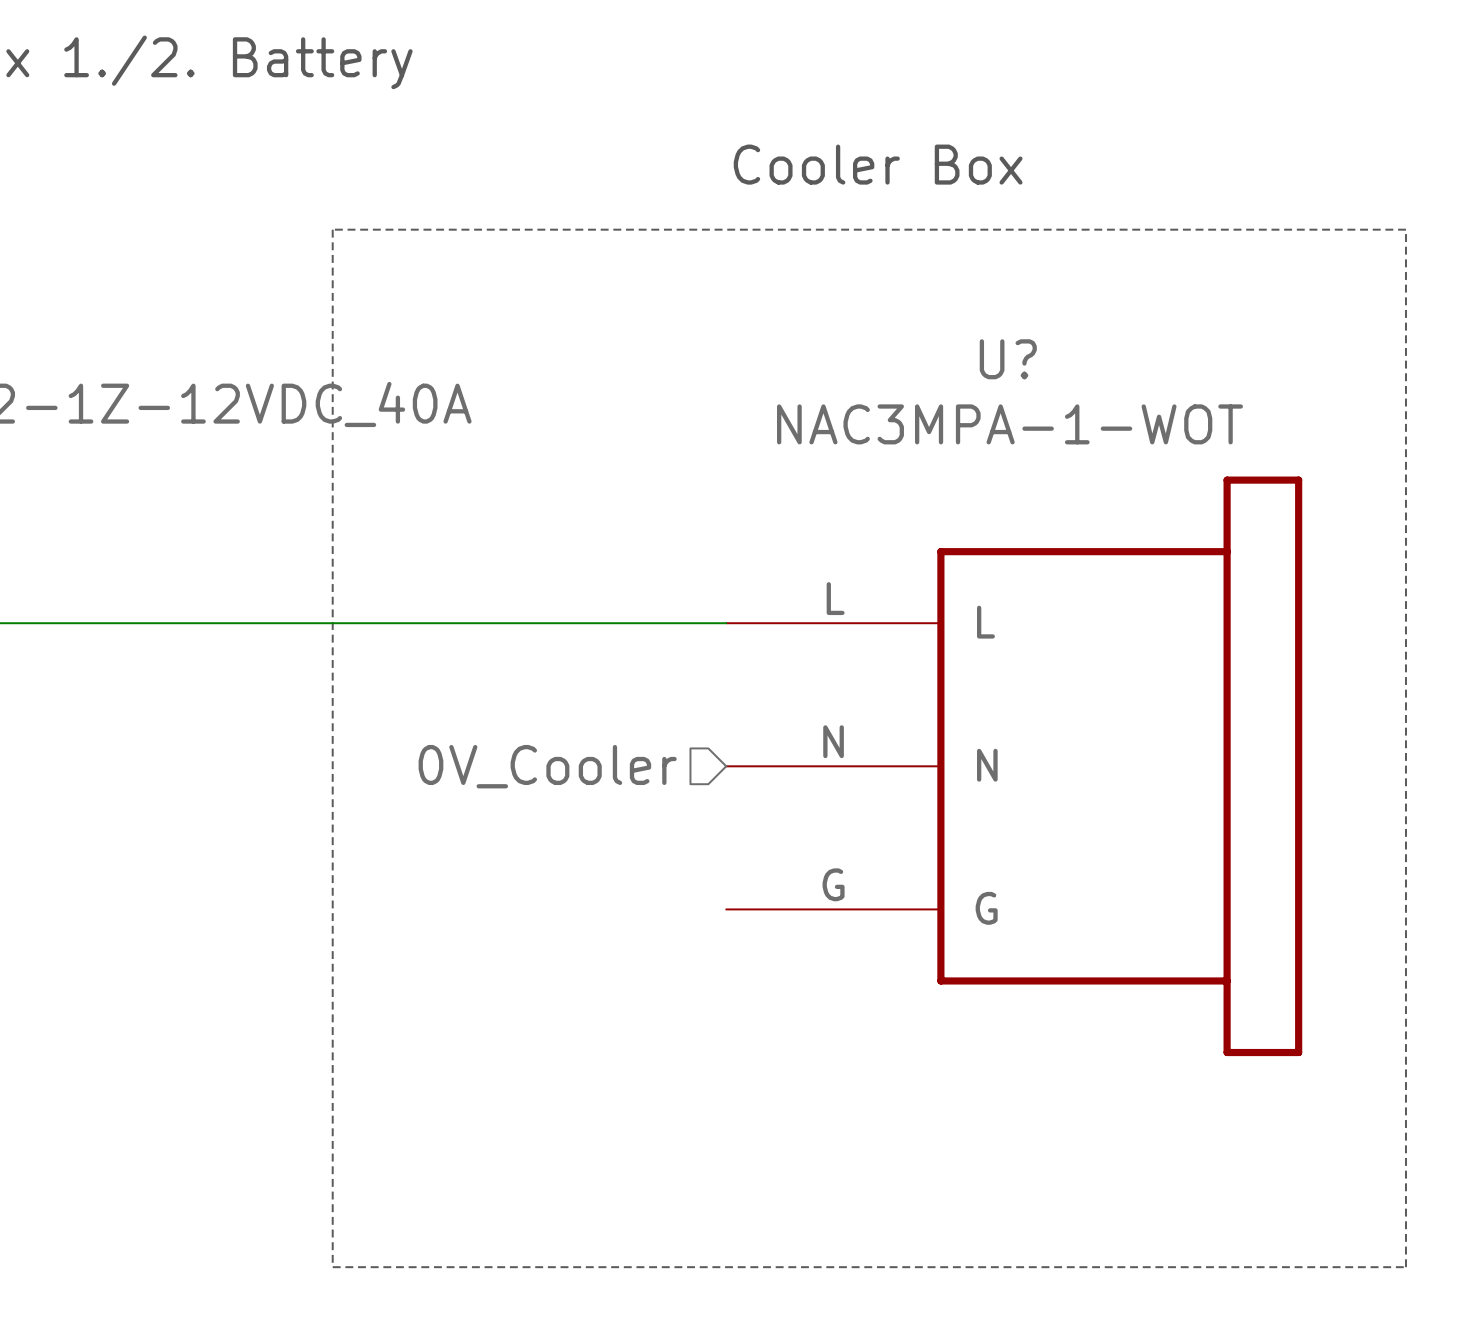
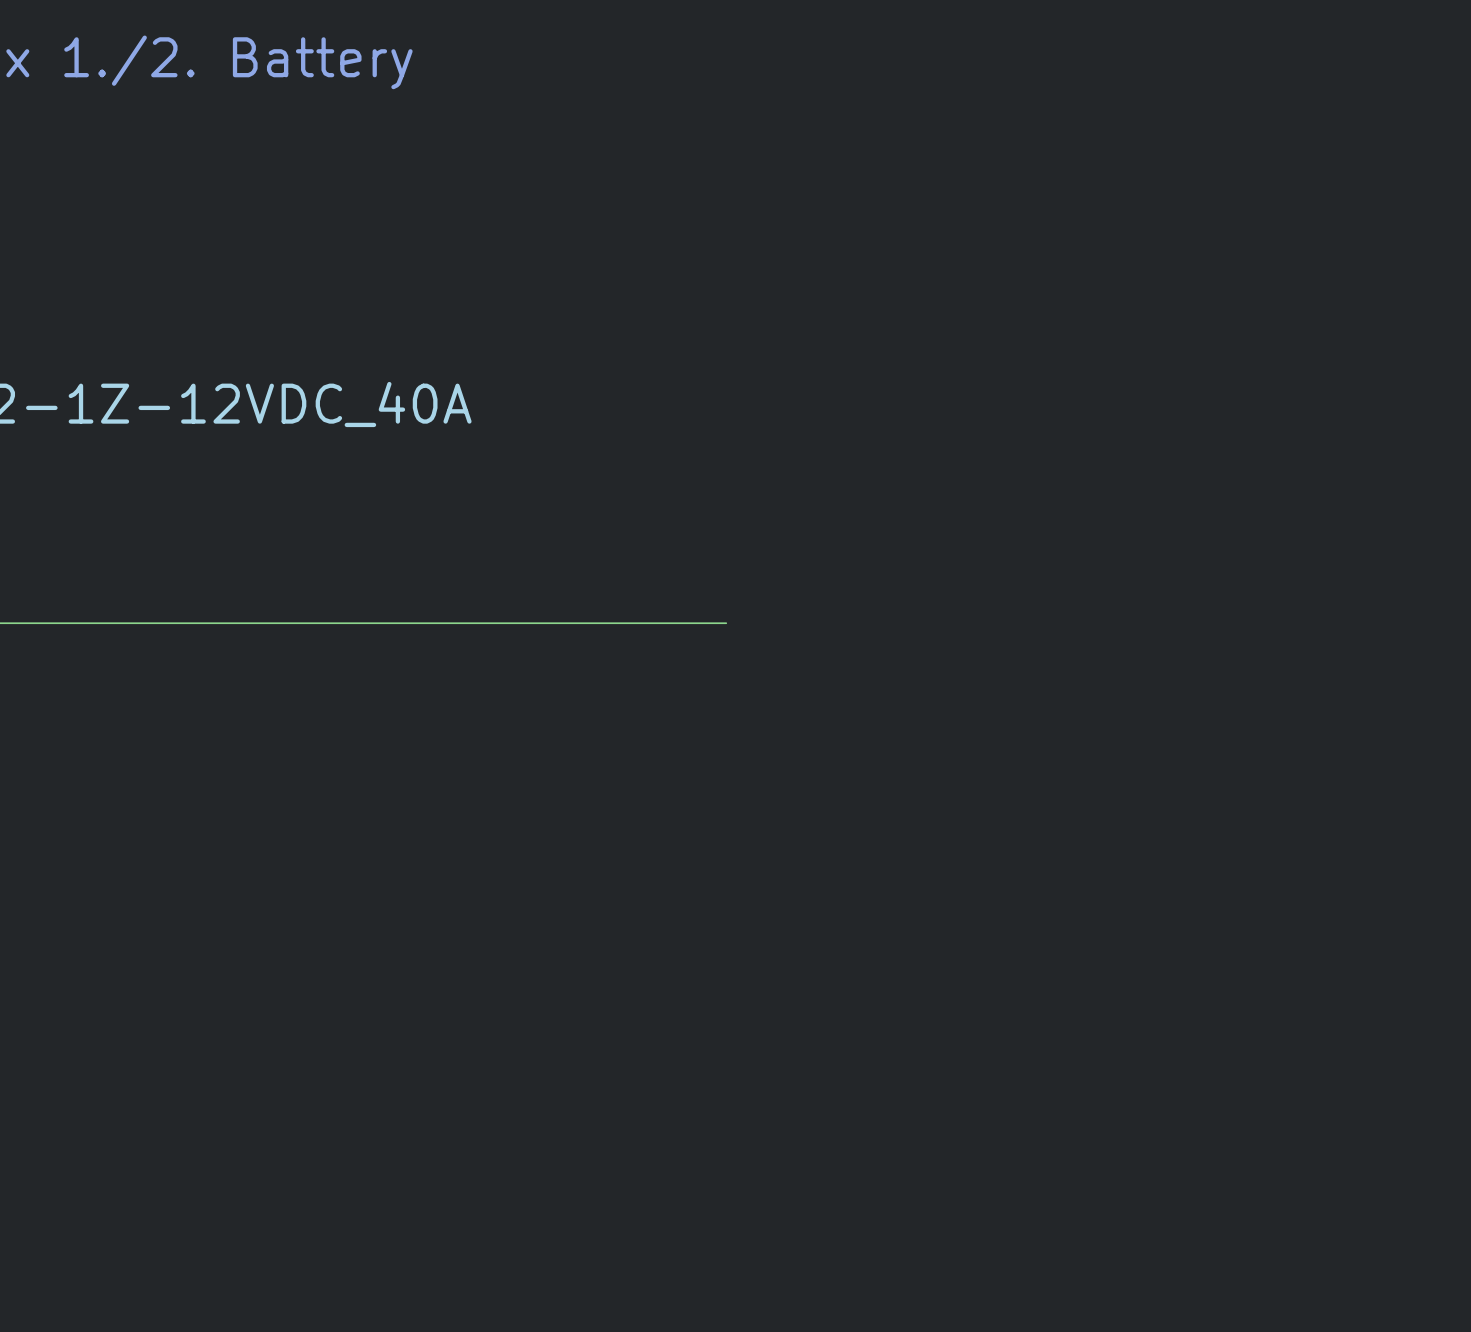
text: Cooler Box (878, 164) -> none
line: (332, 229) (332, 1267) (1405, 1267) (1405, 229) (332, 229) -> none
hierarchical label: 0V_Cooler (547, 766) -> none
U?: NAC3MPA-1-WOT (1014, 766) -> none

